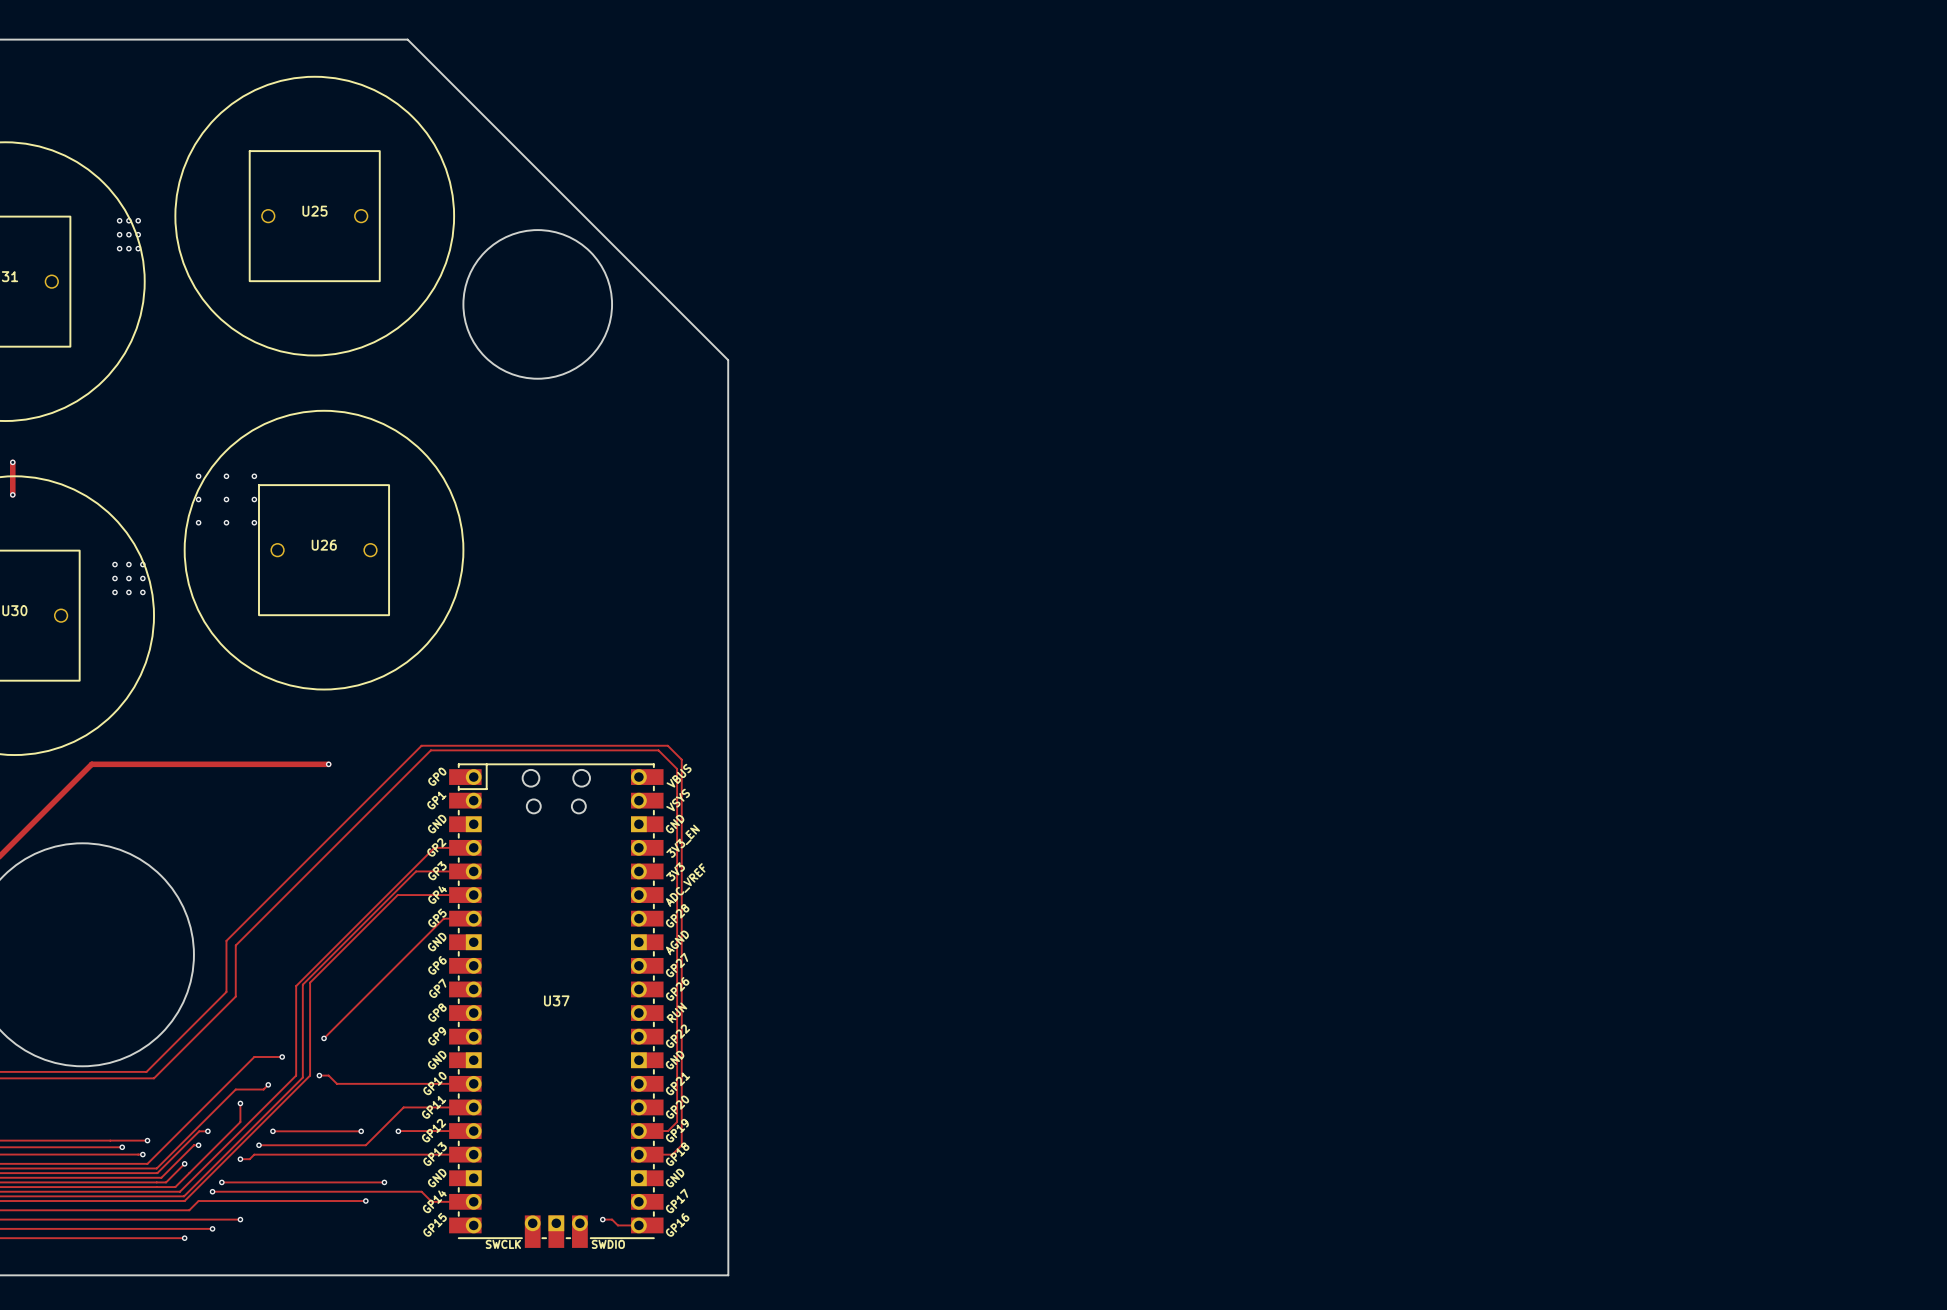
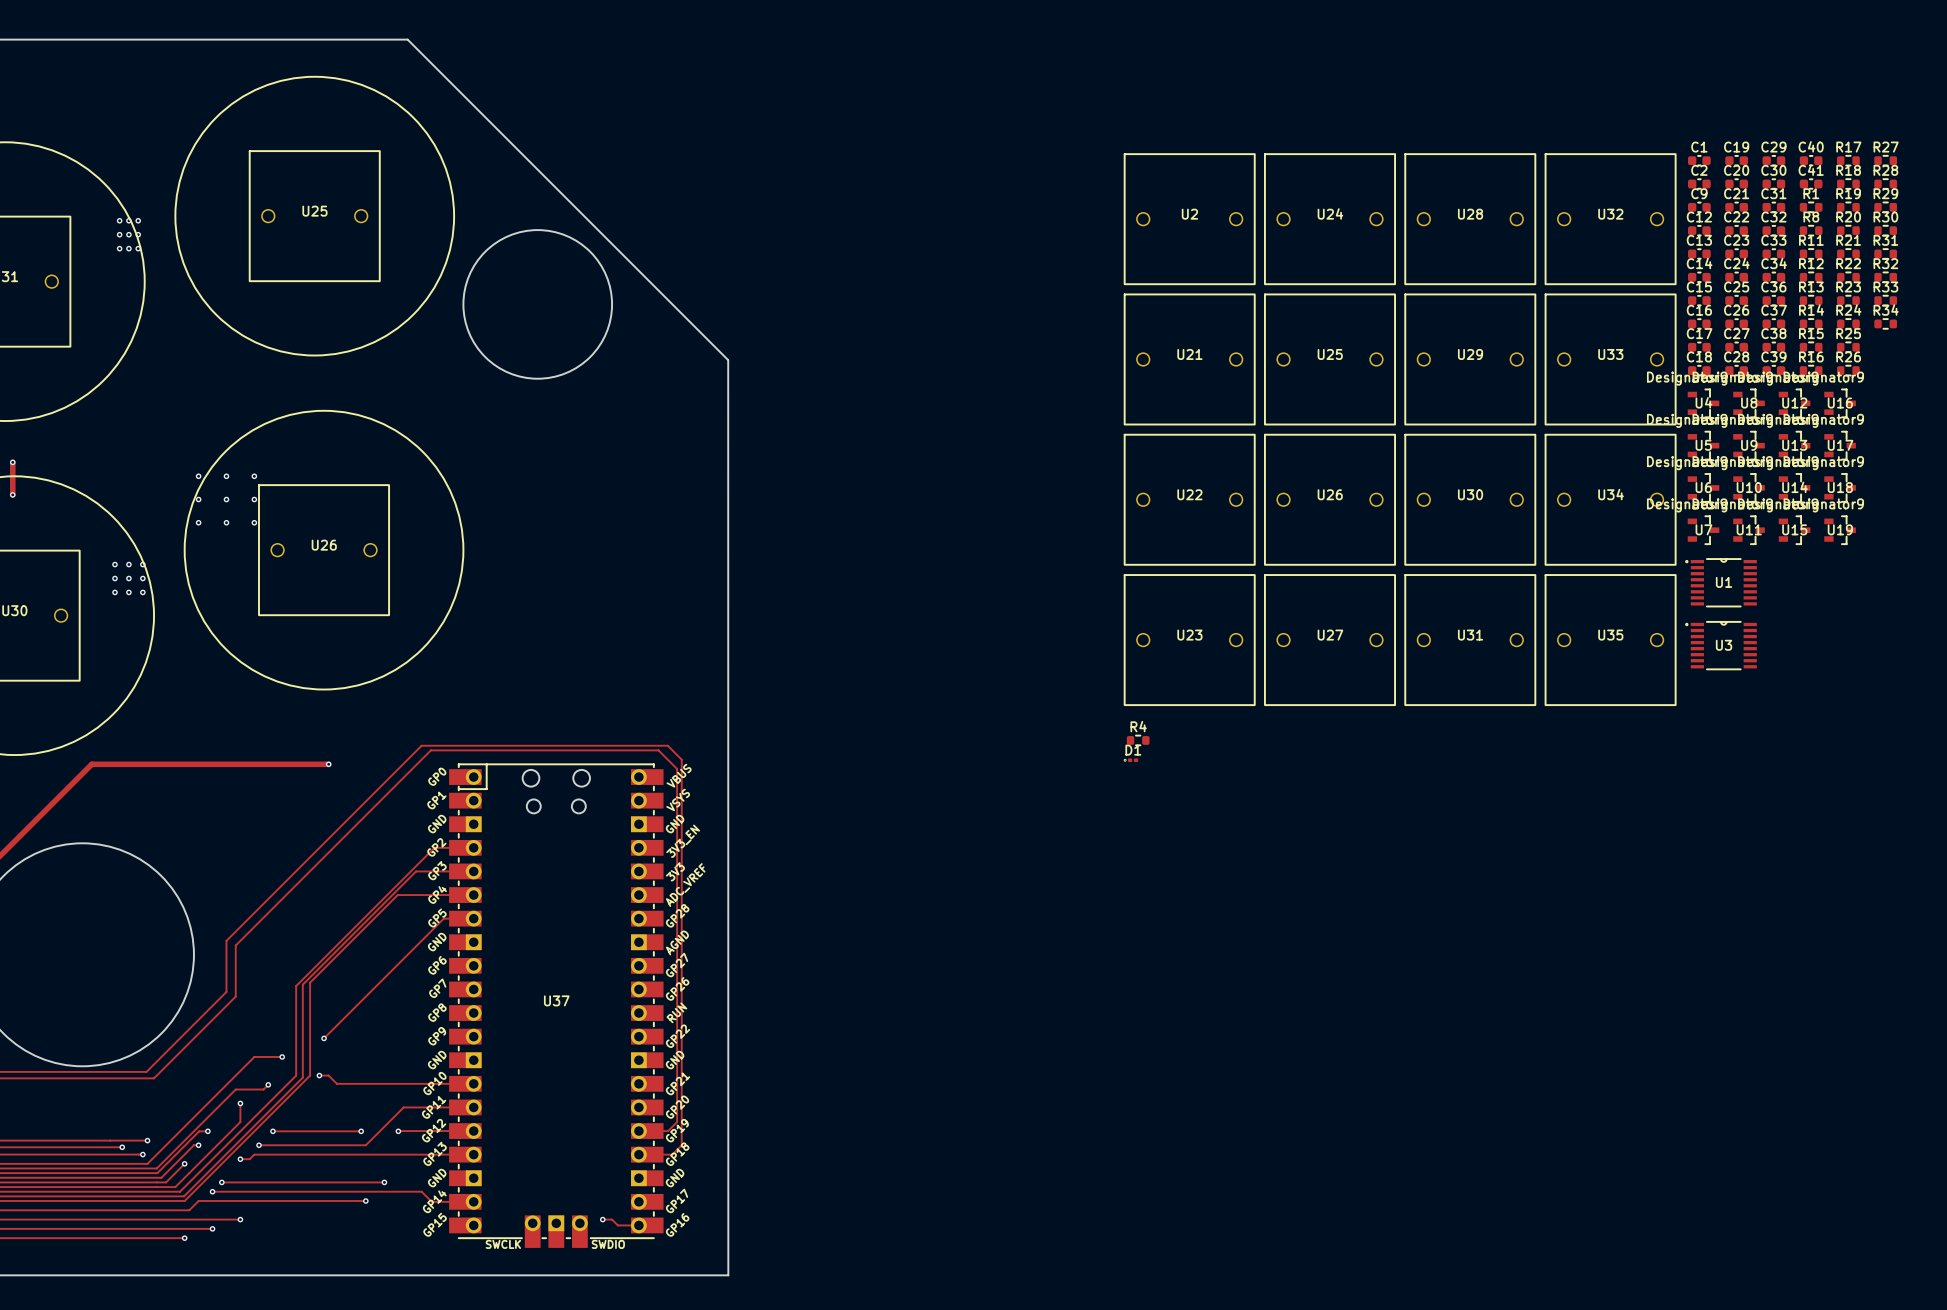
C1: none -> (1699, 160)
C19: none -> (1736, 160)
C29: none -> (1773, 160)
C40: none -> (1811, 160)
R17: none -> (1848, 160)
R27: none -> (1885, 160)
C2: none -> (1699, 184)
C20: none -> (1736, 184)
C30: none -> (1773, 184)
C41: none -> (1811, 184)
R18: none -> (1848, 184)
R28: none -> (1885, 184)
C9: none -> (1699, 207)
C21: none -> (1736, 207)
C31: none -> (1773, 207)
R1: none -> (1811, 207)
R19: none -> (1848, 207)
R29: none -> (1885, 207)
U2: none -> (1189, 219)
U24: none -> (1330, 219)
U28: none -> (1470, 219)
U32: none -> (1610, 219)
C12: none -> (1699, 230)
C22: none -> (1736, 230)
C32: none -> (1773, 230)
R8: none -> (1811, 230)
R20: none -> (1848, 230)
R30: none -> (1885, 230)
C13: none -> (1699, 253)
C23: none -> (1736, 253)
C33: none -> (1773, 253)
R11: none -> (1811, 253)
R21: none -> (1848, 253)
R31: none -> (1885, 253)
C14: none -> (1699, 277)
C24: none -> (1736, 277)
C34: none -> (1773, 277)
R12: none -> (1811, 277)
R22: none -> (1848, 277)
R32: none -> (1885, 277)
C15: none -> (1699, 300)
C25: none -> (1736, 300)
C36: none -> (1773, 300)
R13: none -> (1811, 300)
R23: none -> (1848, 300)
R33: none -> (1885, 300)
C16: none -> (1699, 323)
C26: none -> (1736, 323)
C37: none -> (1773, 323)
R14: none -> (1811, 323)
R24: none -> (1848, 323)
R34: none -> (1885, 323)
C17: none -> (1699, 347)
C27: none -> (1736, 347)
C38: none -> (1773, 347)
R15: none -> (1811, 347)
R25: none -> (1848, 347)
U21: none -> (1189, 359)
U25: none -> (1330, 359)
U29: none -> (1470, 359)
U33: none -> (1610, 359)
C18: none -> (1699, 370)
C28: none -> (1736, 370)
C39: none -> (1773, 370)
R16: none -> (1811, 370)
R26: none -> (1848, 370)
U4: none -> (1703, 403)
U8: none -> (1749, 403)
U12: none -> (1794, 403)
U16: none -> (1840, 403)
U5: none -> (1703, 445)
U9: none -> (1749, 445)
U13: none -> (1794, 445)
U17: none -> (1840, 445)
U6: none -> (1703, 487)
U10: none -> (1749, 487)
U14: none -> (1794, 487)
U18: none -> (1840, 487)
U22: none -> (1189, 499)
U26: none -> (1330, 499)
U30: none -> (1470, 499)
U34: none -> (1610, 499)
U7: none -> (1703, 530)
U11: none -> (1749, 530)
U15: none -> (1794, 530)
U19: none -> (1840, 530)
U1: none -> (1721, 582)
U23: none -> (1189, 640)
U27: none -> (1330, 640)
U31: none -> (1470, 640)
U35: none -> (1610, 640)
U3: none -> (1721, 645)
R4: none -> (1138, 740)
D1: none -> (1131, 760)

